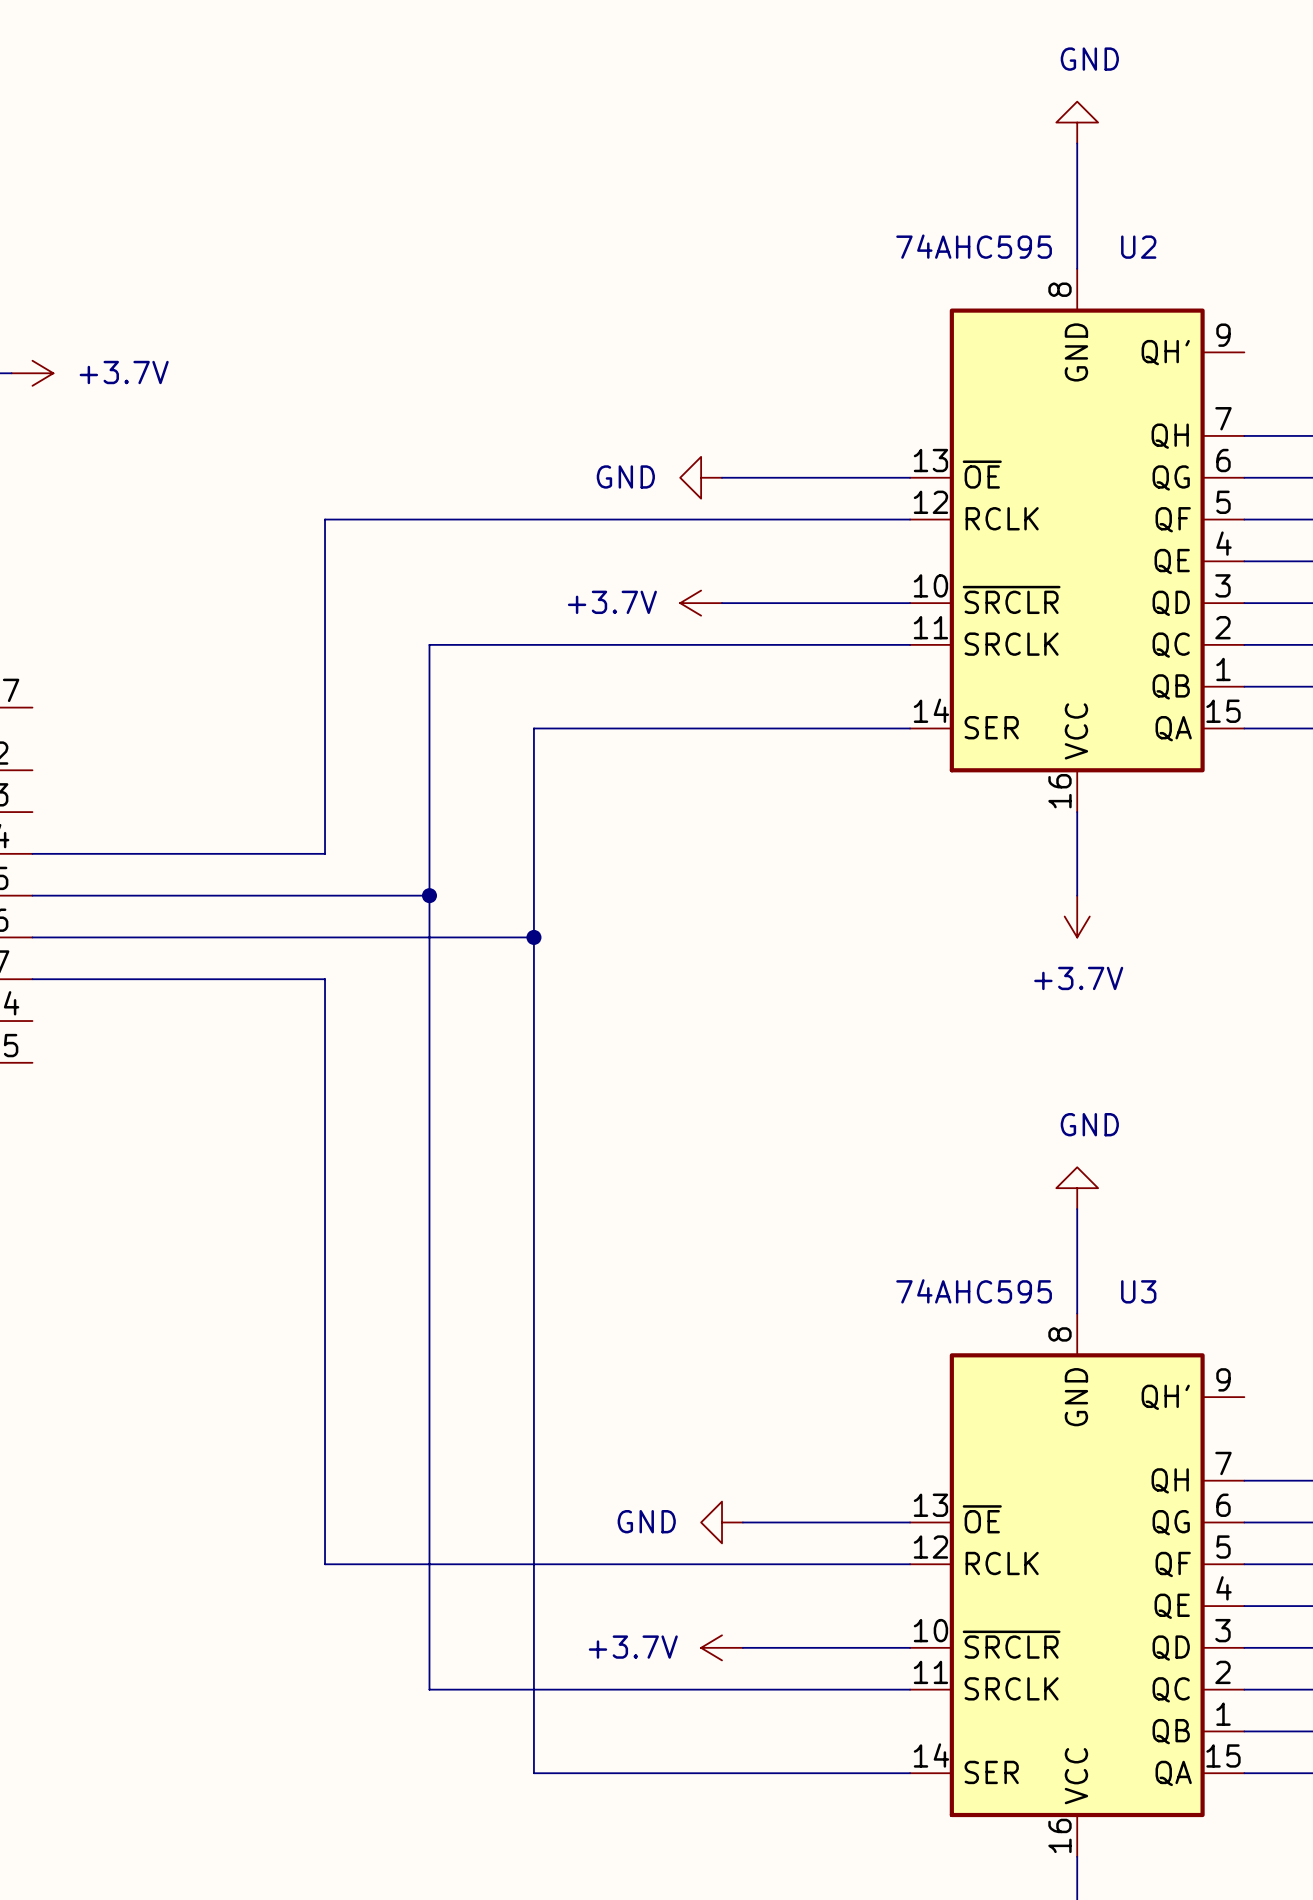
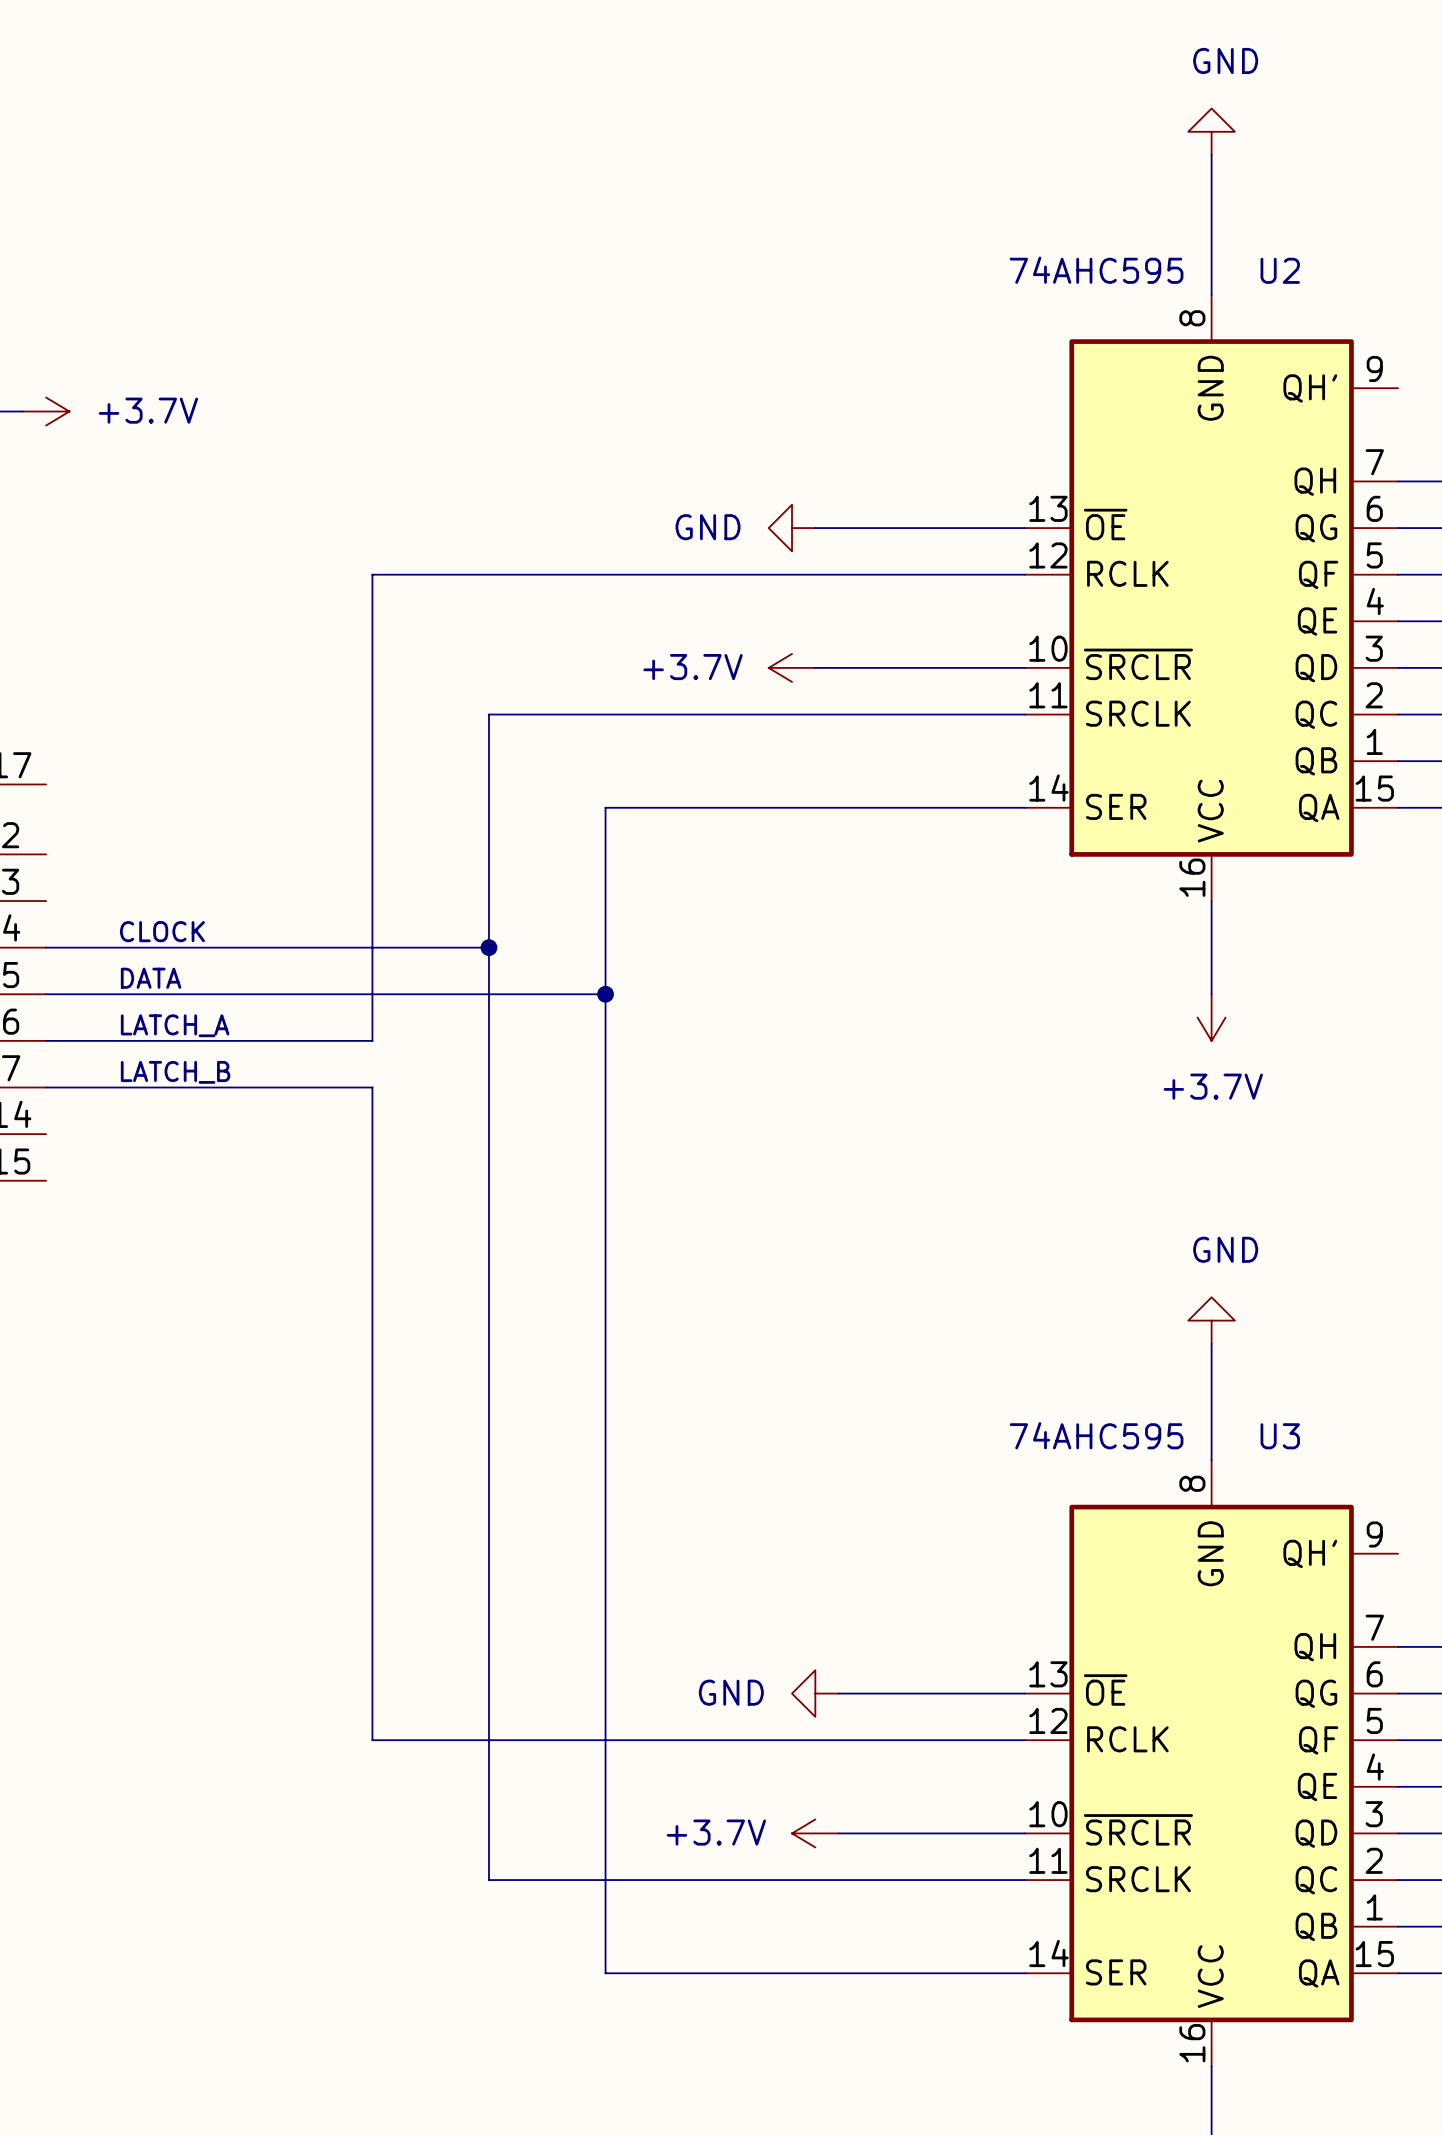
text: none -> CLOCK (162, 931)
text: none -> DATA (151, 978)
wire: none -> (488, 994) (605, 994)
junction position: (429, 895) -> (488, 947)
text: none -> LATCH_A (175, 1025)
wire: (325, 937) (533, 937) -> (372, 1040) (372, 947) (488, 947)
junction position: (533, 937) -> (605, 994)
text: none -> LATCH_B (175, 1072)

